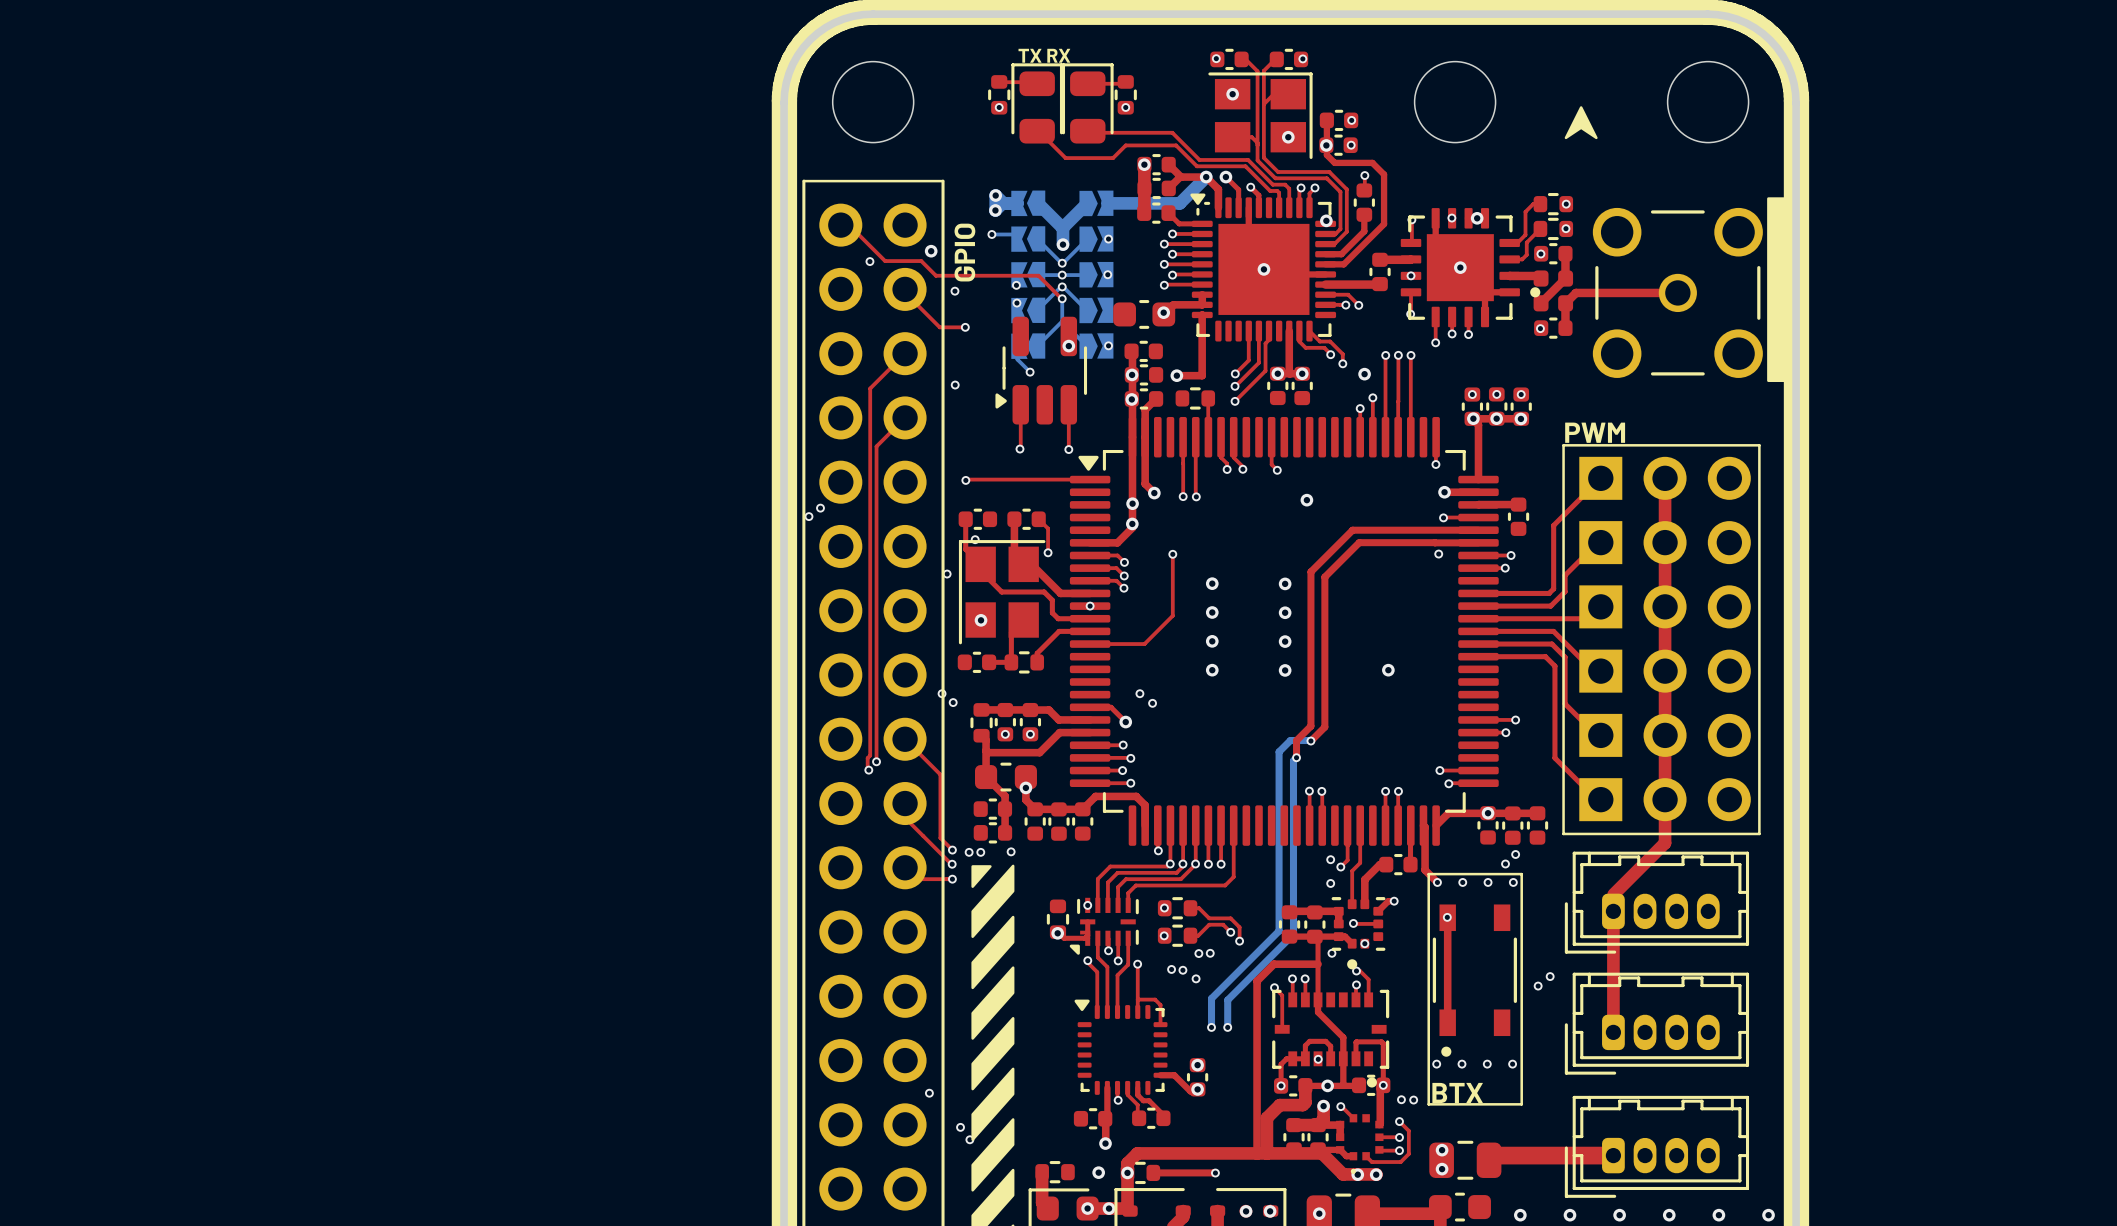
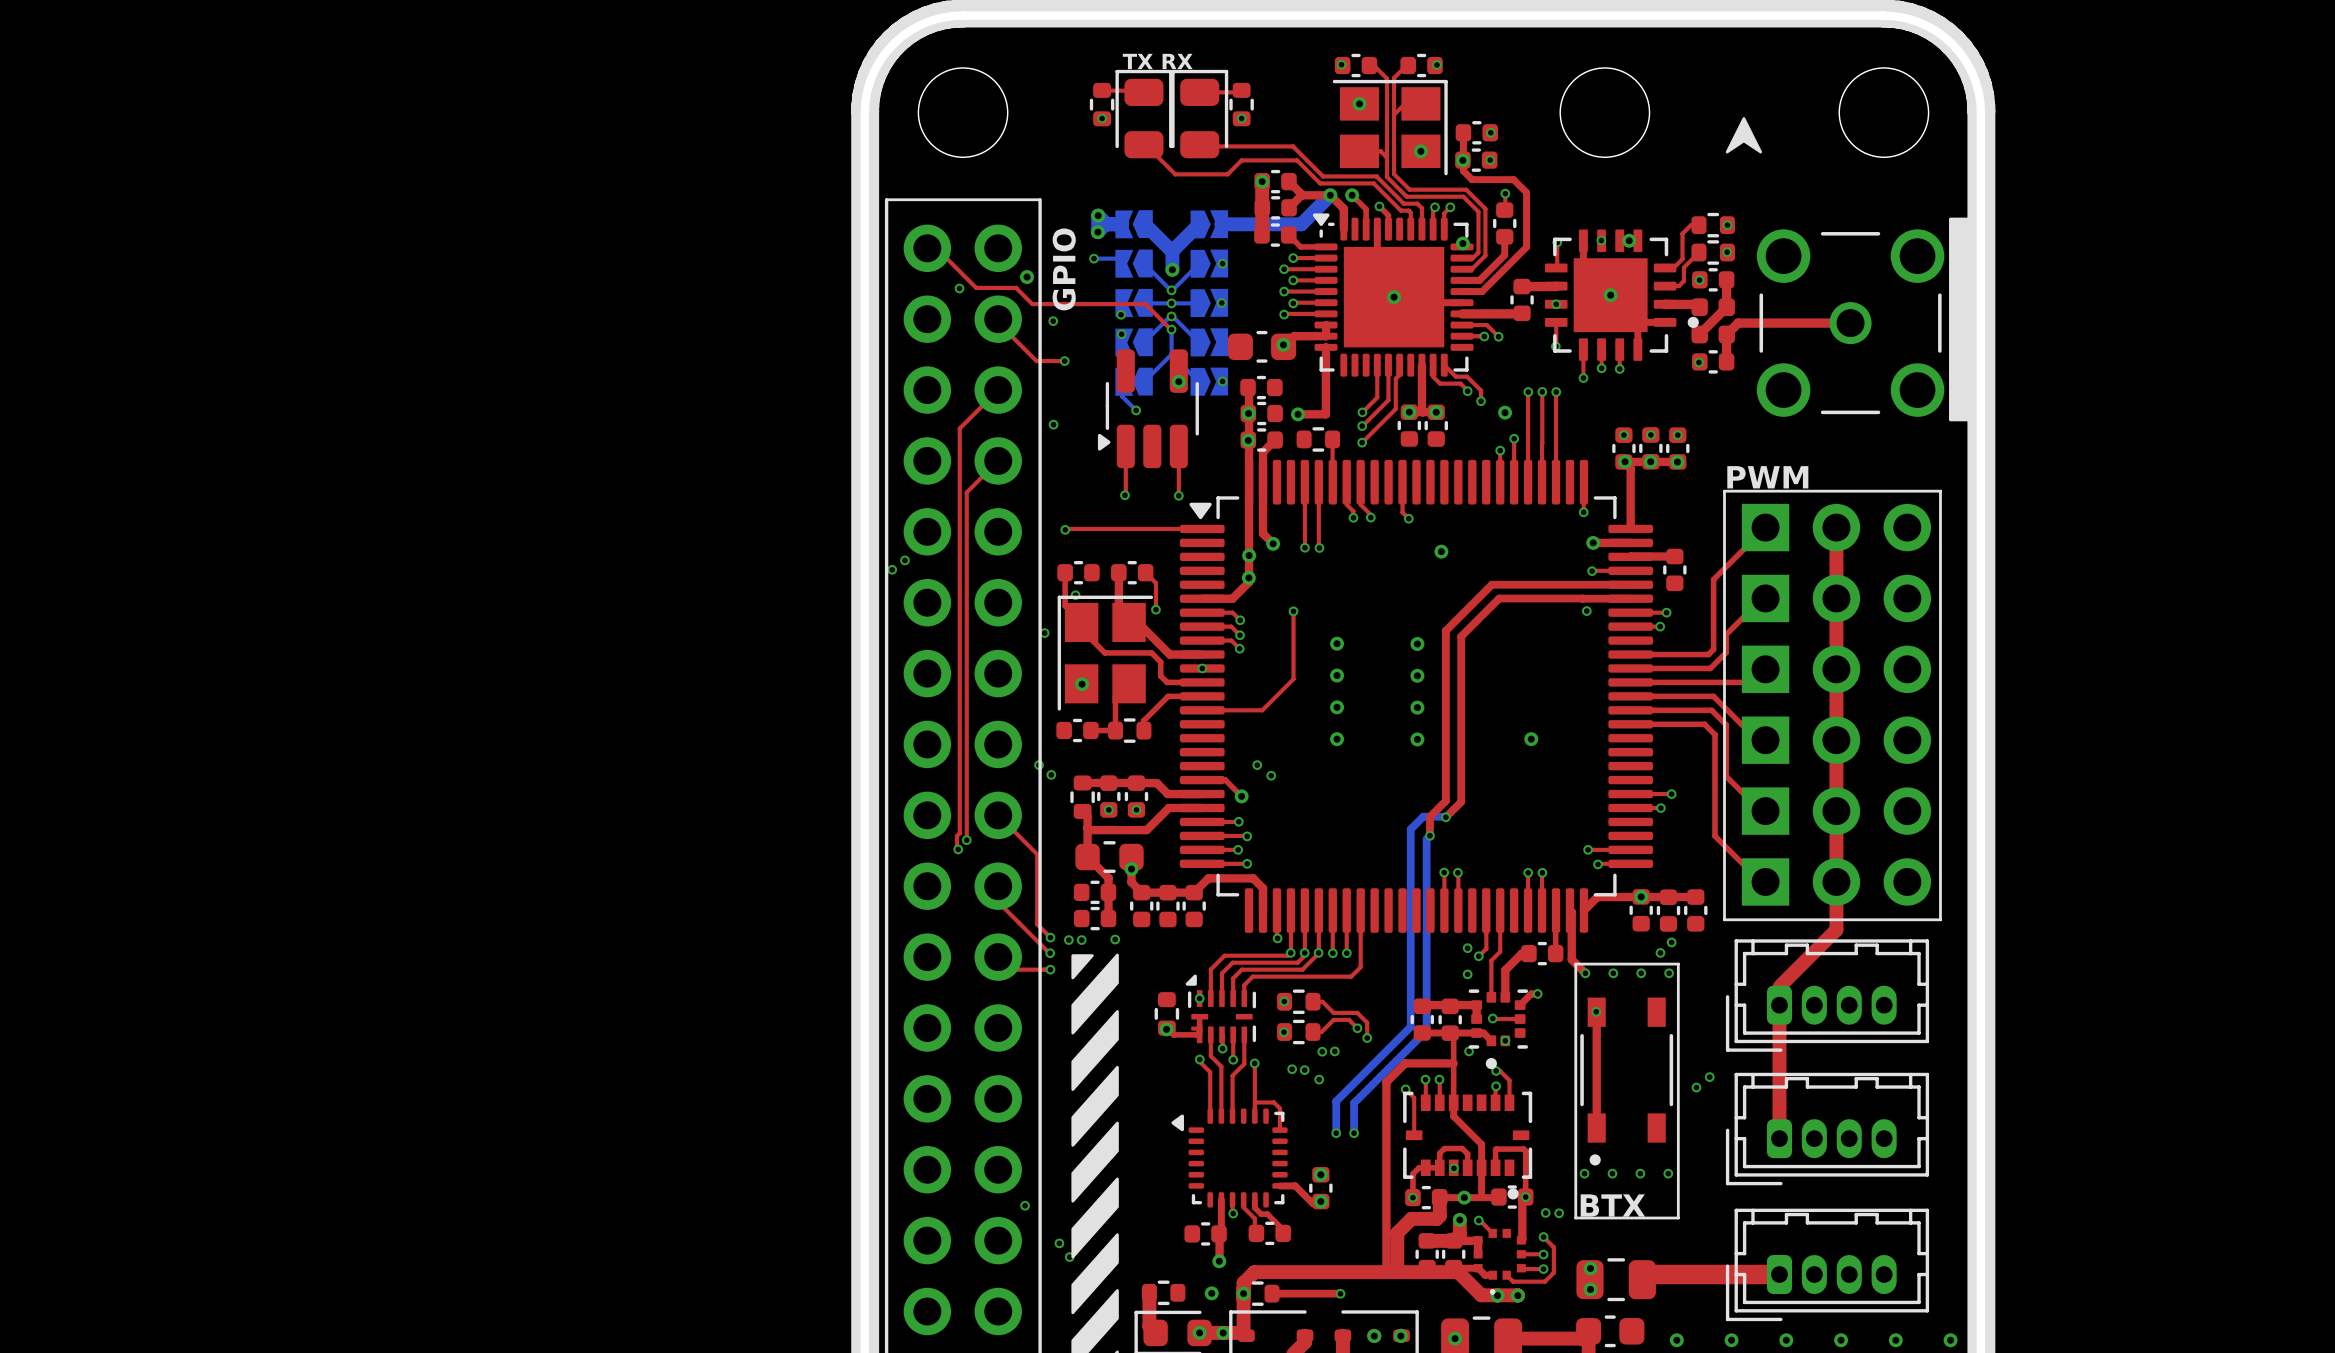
part footprint: [1069, 897, 1139, 955] -> [1185, 974, 1257, 1044]
part footprint: [1074, 999, 1168, 1095] -> [1171, 1108, 1288, 1208]

